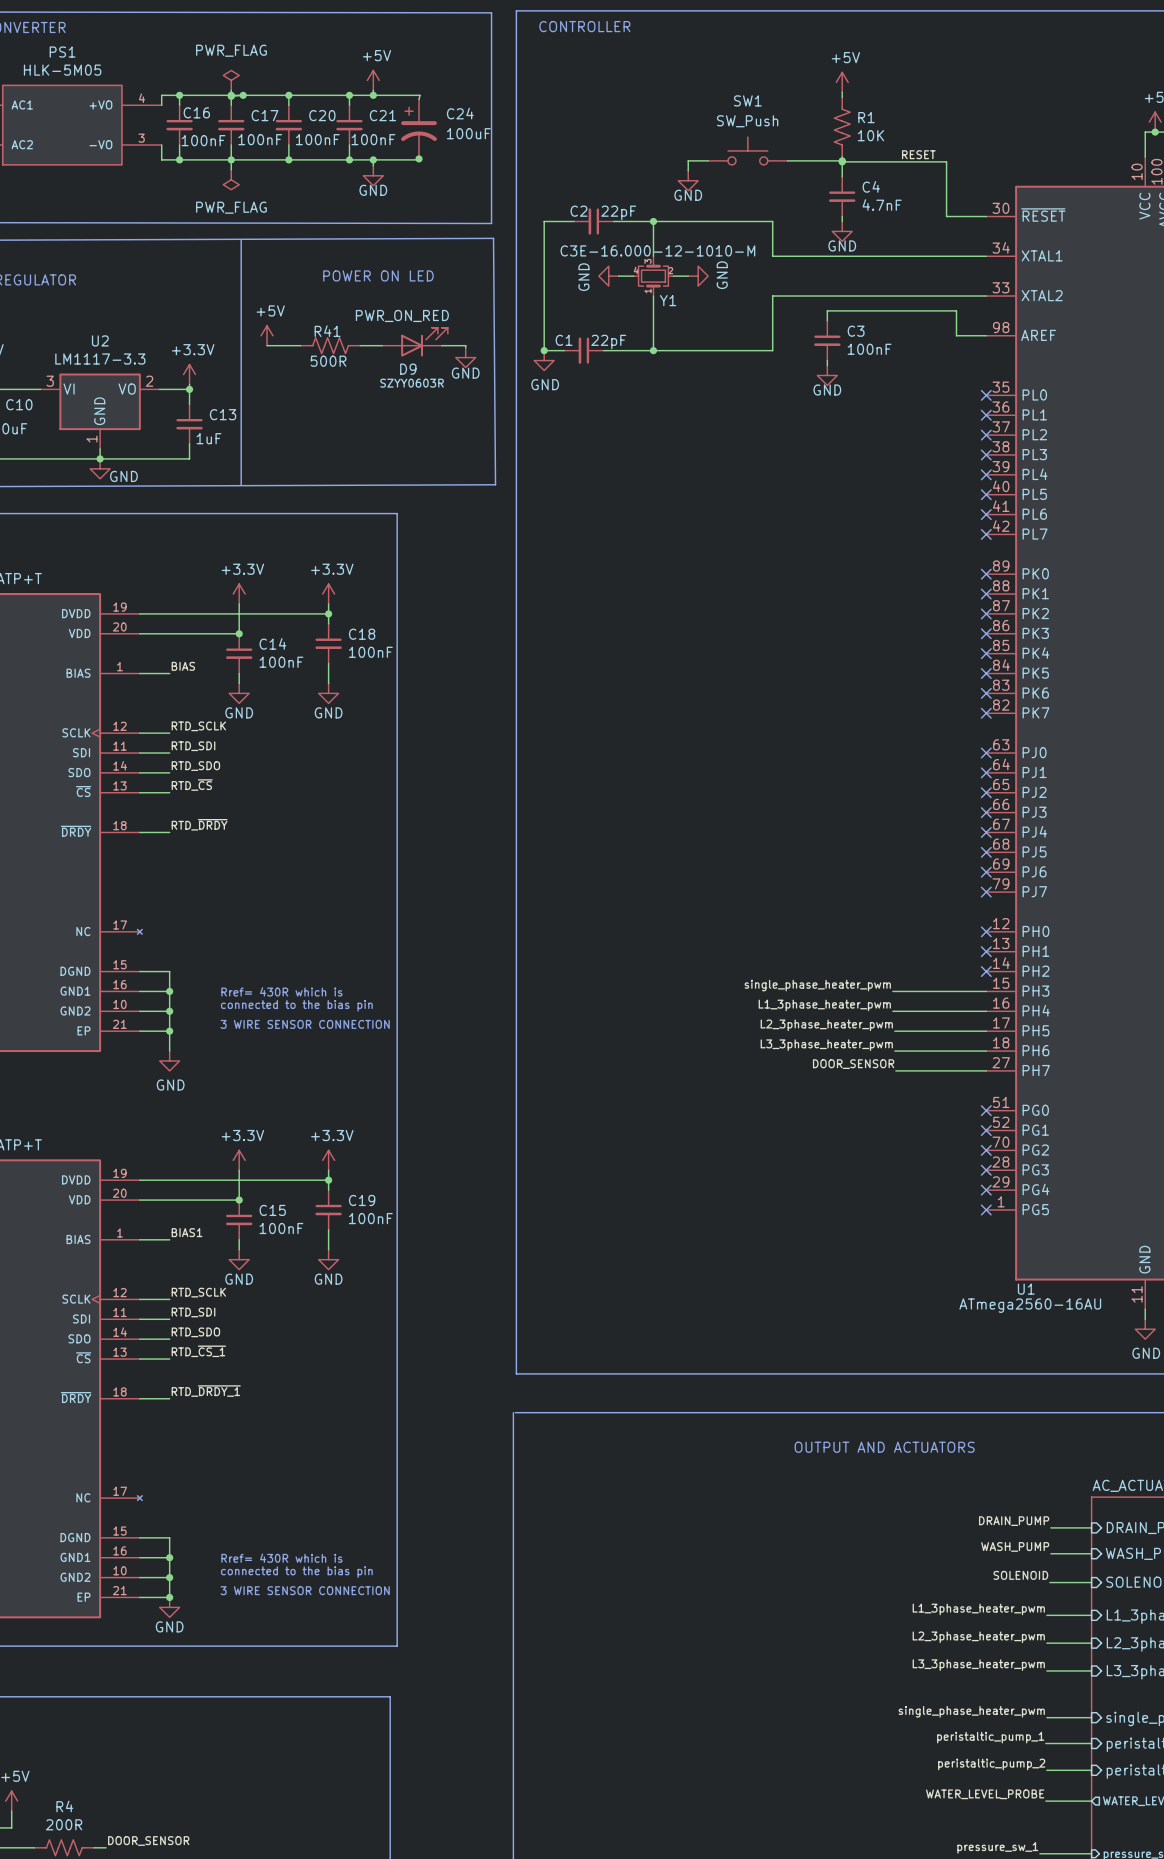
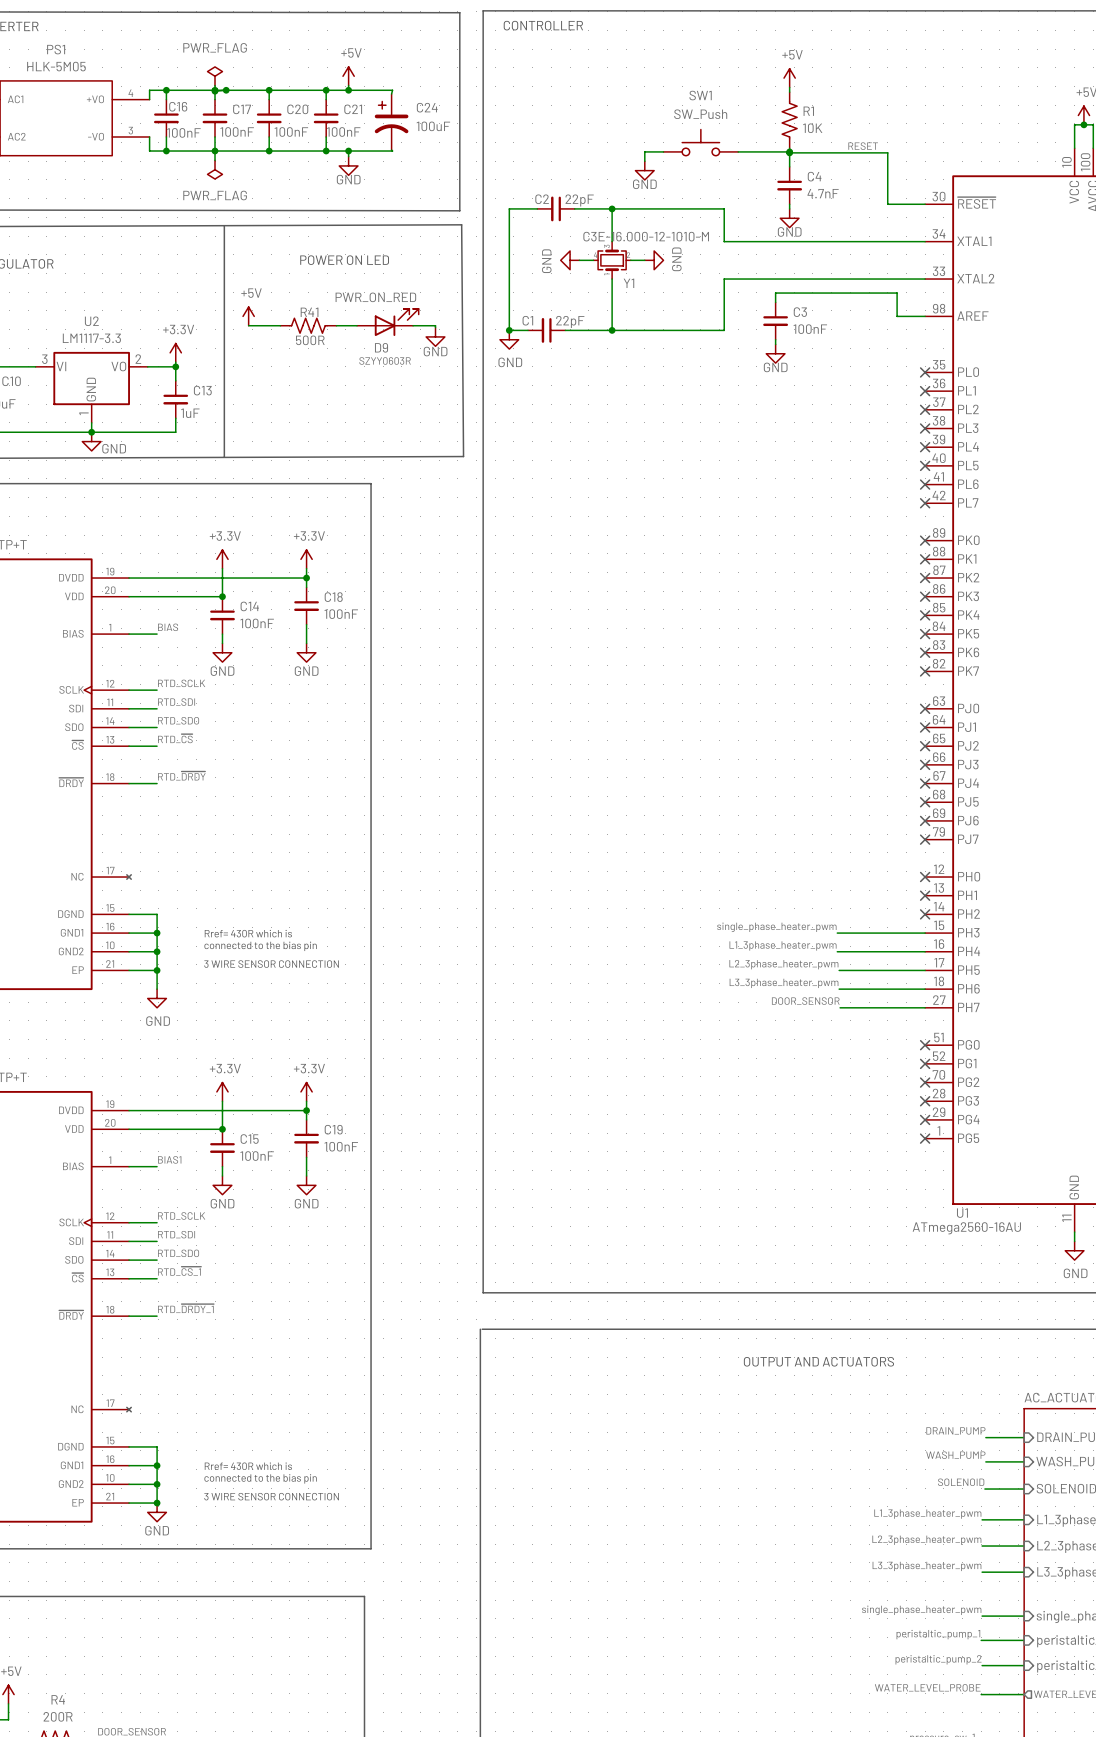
junction: (419, 158) -> none

